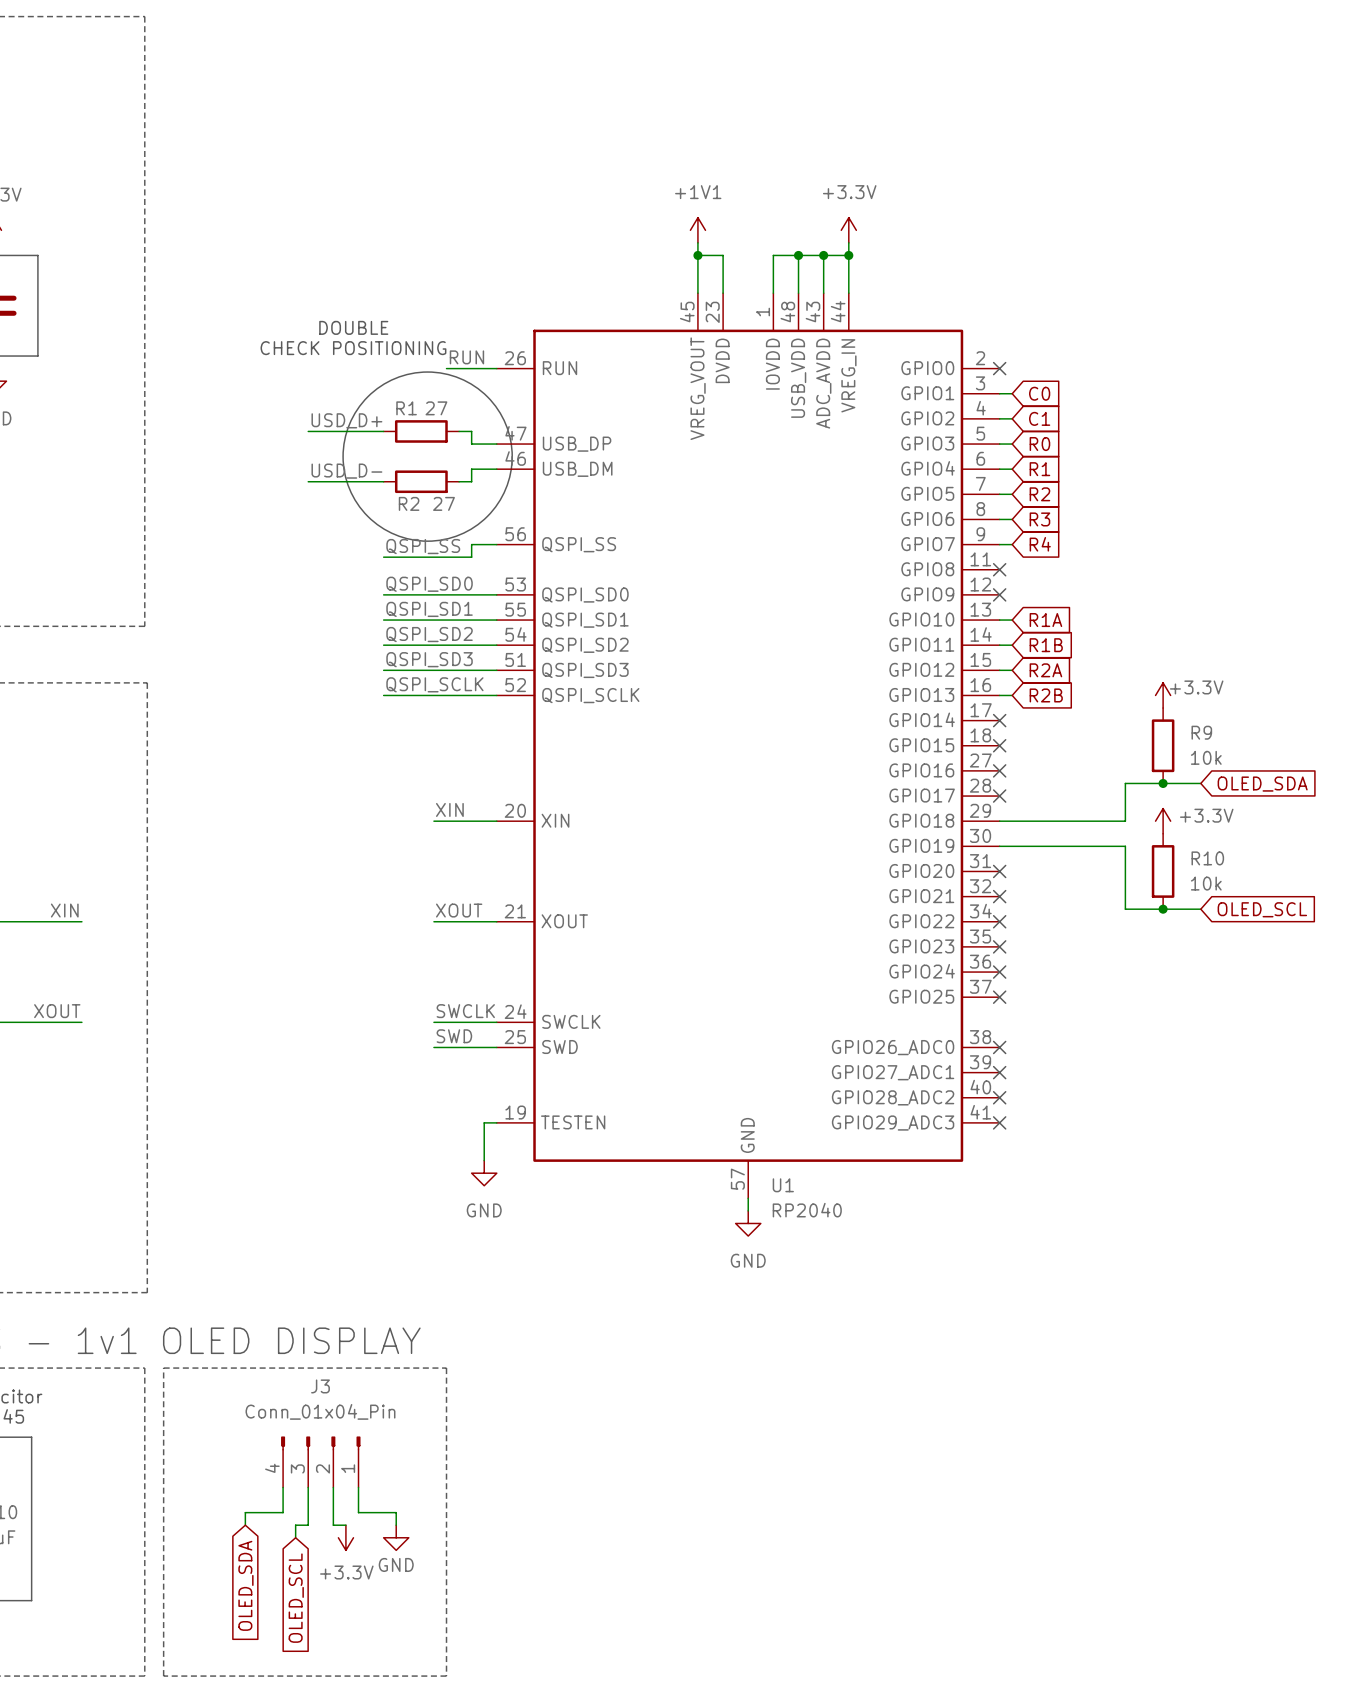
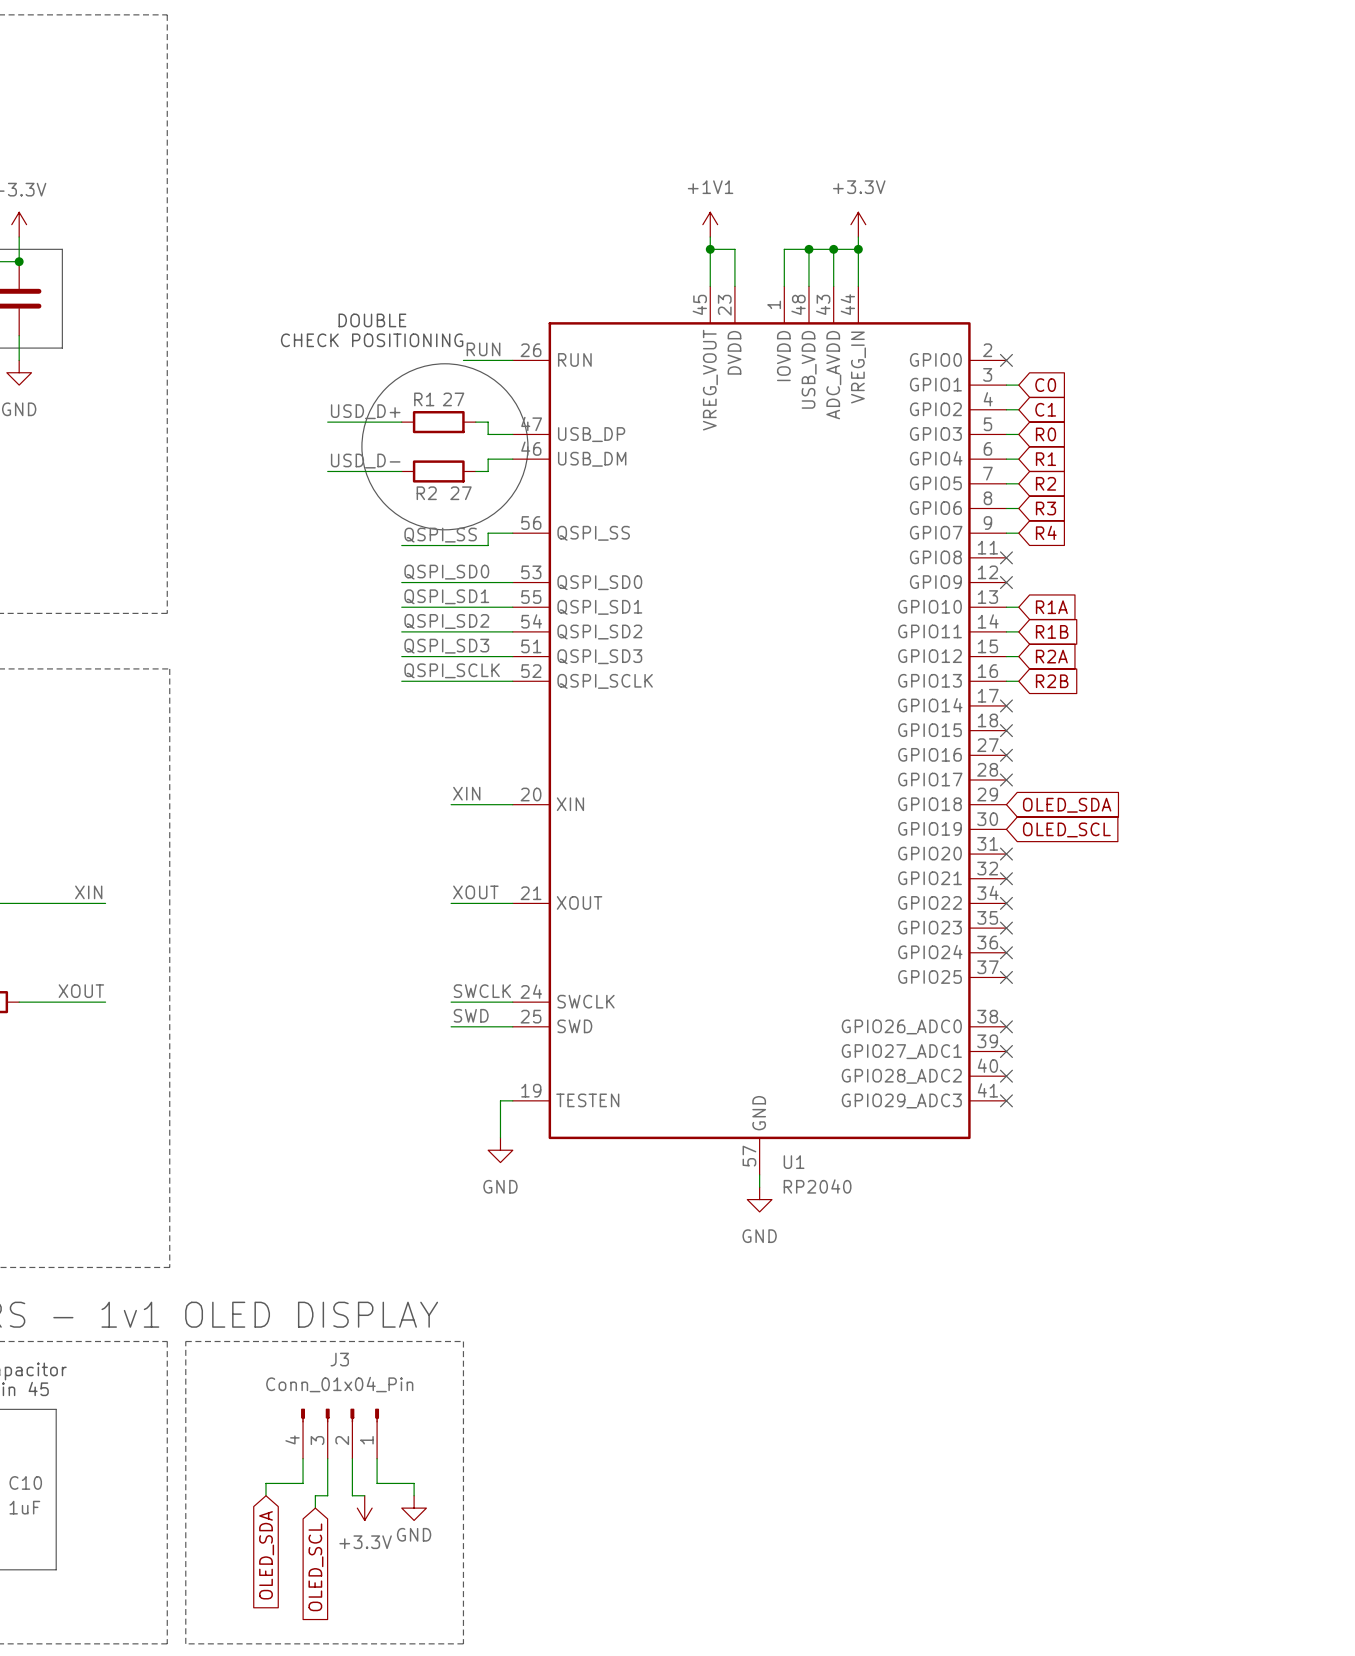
power symbol: +3.3V (1163, 695) -> none
R9: 10k (1163, 745) -> none
junction: (1163, 783) -> none
wire: (1200, 783) (1125, 783) (1125, 821) (999, 821) -> none
global label position: OLED_SDA (1262, 784) -> OLED_SDA (1067, 805)
power symbol: +3.3V (1163, 821) -> none
wire: (999, 846) (1125, 846) (1125, 909) (1200, 909) -> none
R10: 10k (1163, 871) -> none
junction: (1163, 909) -> none
global label position: OLED_SCL (1262, 909) -> OLED_SCL (1066, 829)

